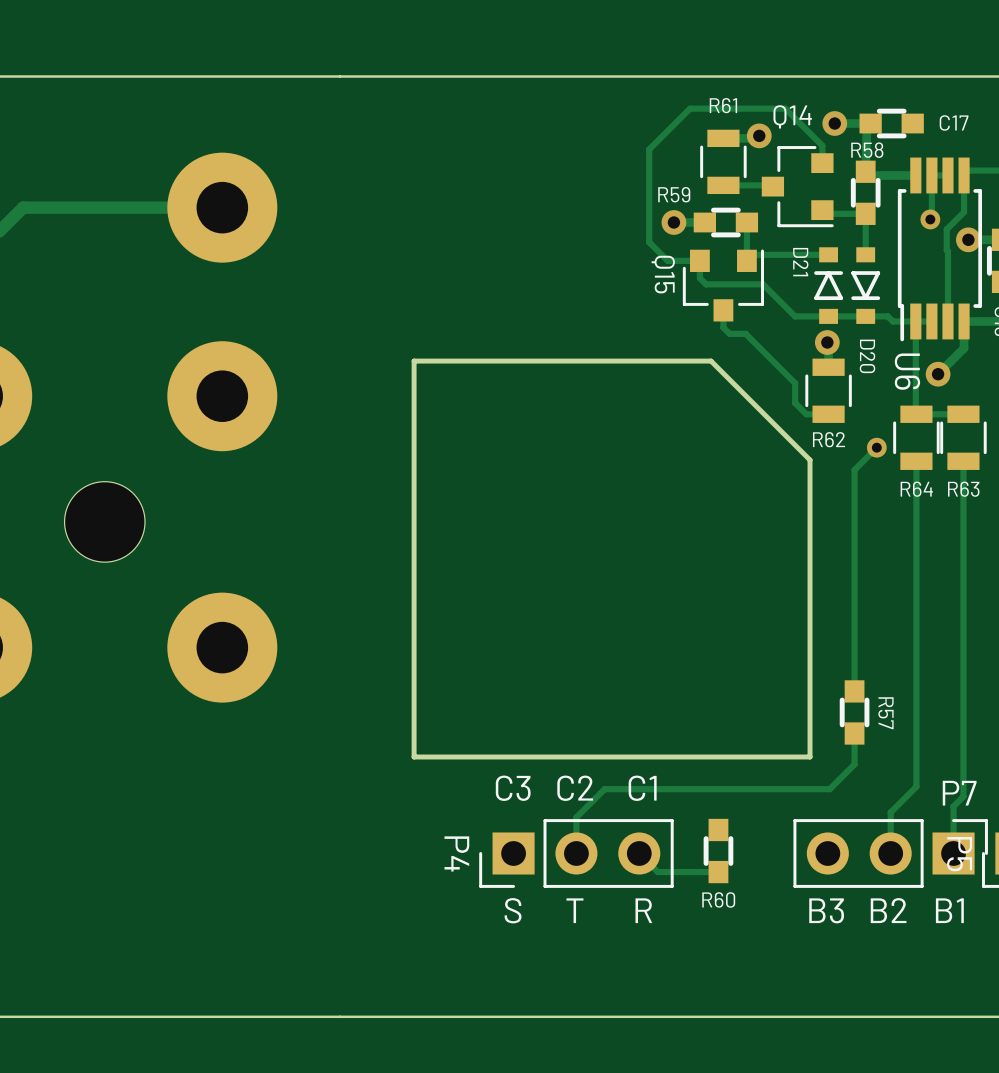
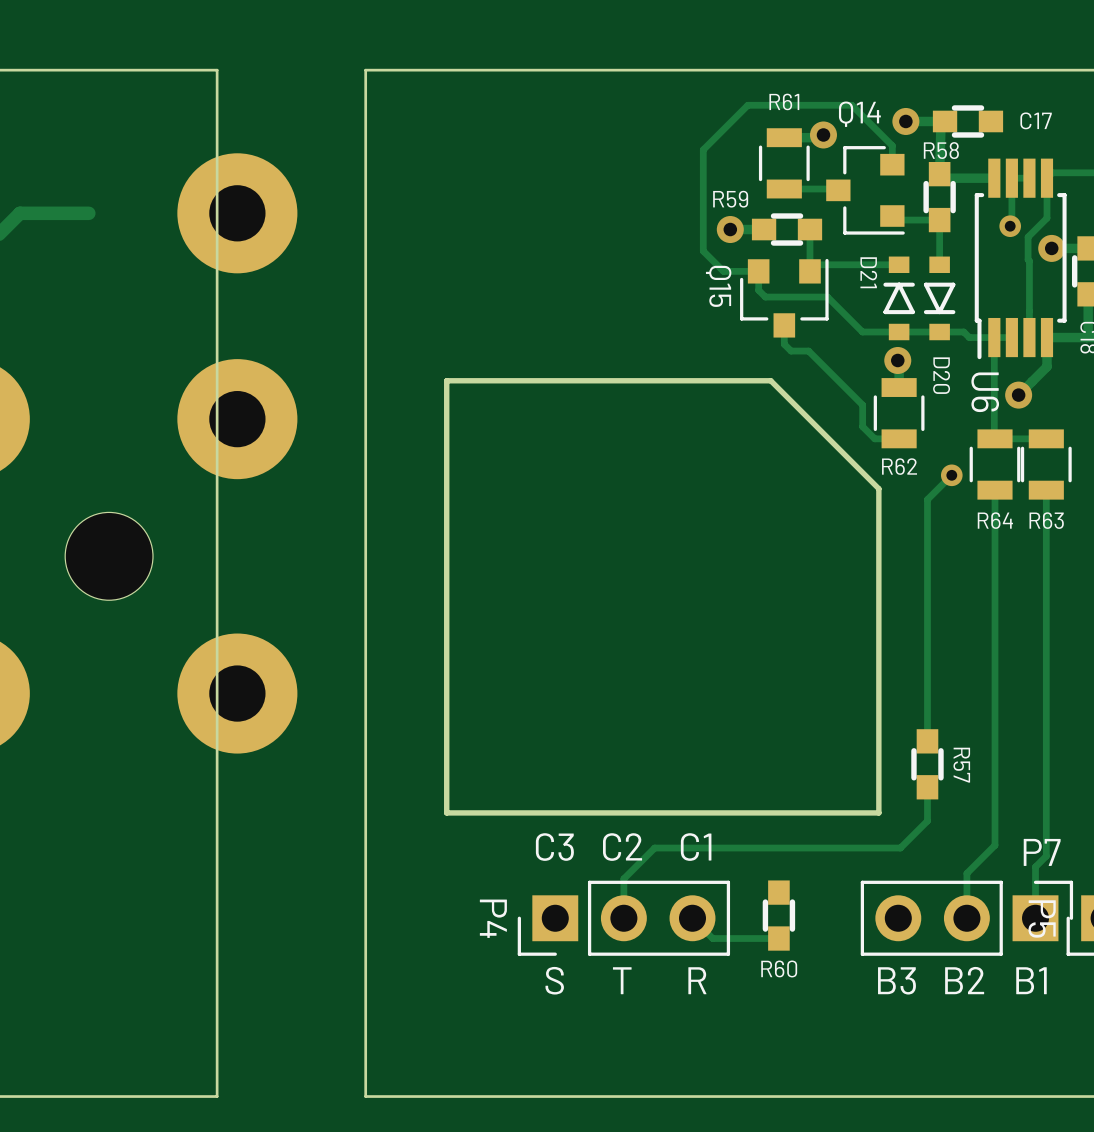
board edge: (339, 76) (203, 76) -> (365, 70) (365, 1096)
track: (222, 207) (86, 207) -> none
board edge: (339, 1016) (203, 1016) -> (217, 70) (217, 1096)

